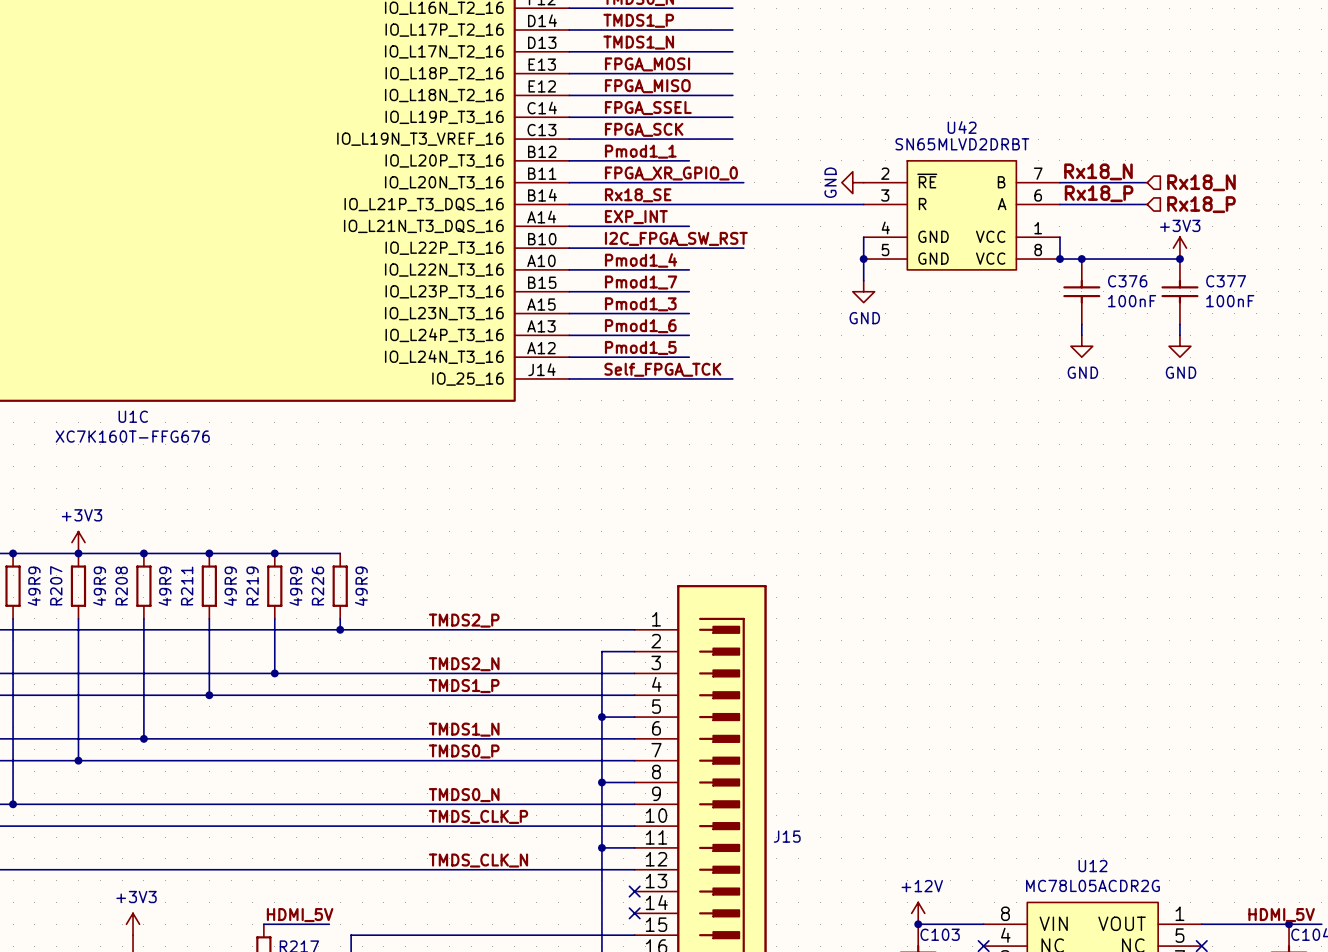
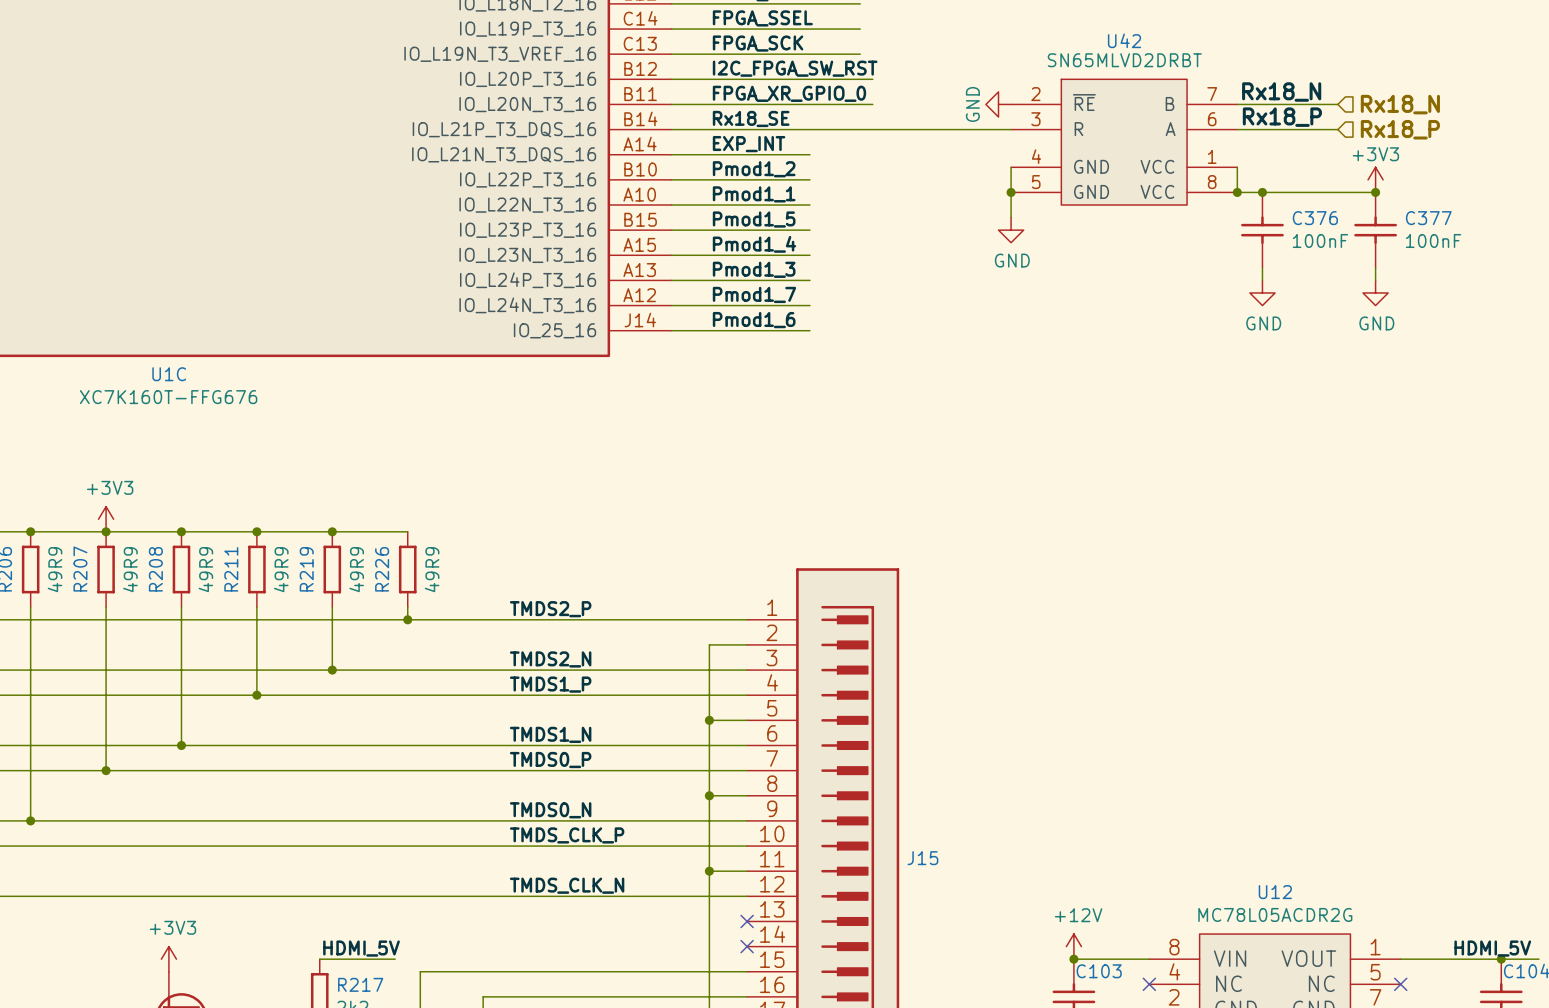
label: Pmod1_1 (640, 151) -> I2C_FPGA_SW_RST (795, 68)
label: I2C_FPGA_SW_RST (676, 238) -> Pmod1_2 (754, 169)
wire: (689, 248) (743, 248) -> (809, 79) (872, 79)
label: Pmod1_4 (641, 260) -> Pmod1_1 (754, 194)
label: Pmod1_7 (641, 282) -> Pmod1_5 (754, 219)
label: Pmod1_3 (640, 304) -> Pmod1_4 (754, 244)
label: Pmod1_6 (640, 326) -> Pmod1_3 (754, 269)
label: Pmod1_5 (640, 347) -> Pmod1_7 (754, 294)
label: Self_FPGA_TCK (662, 369) -> Pmod1_6 (754, 320)
wire: (689, 378) (732, 378) -> none

